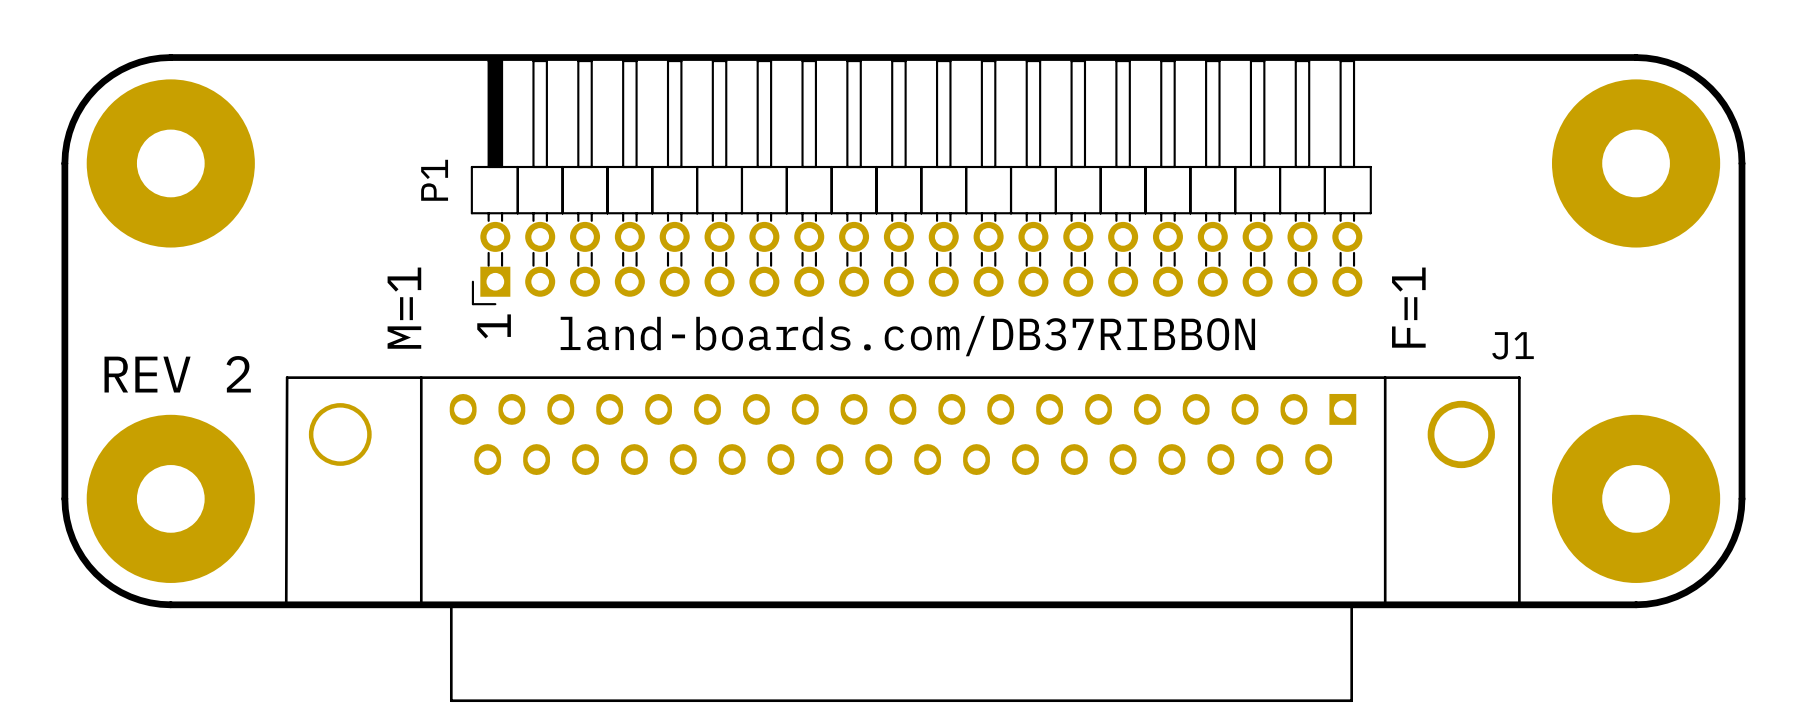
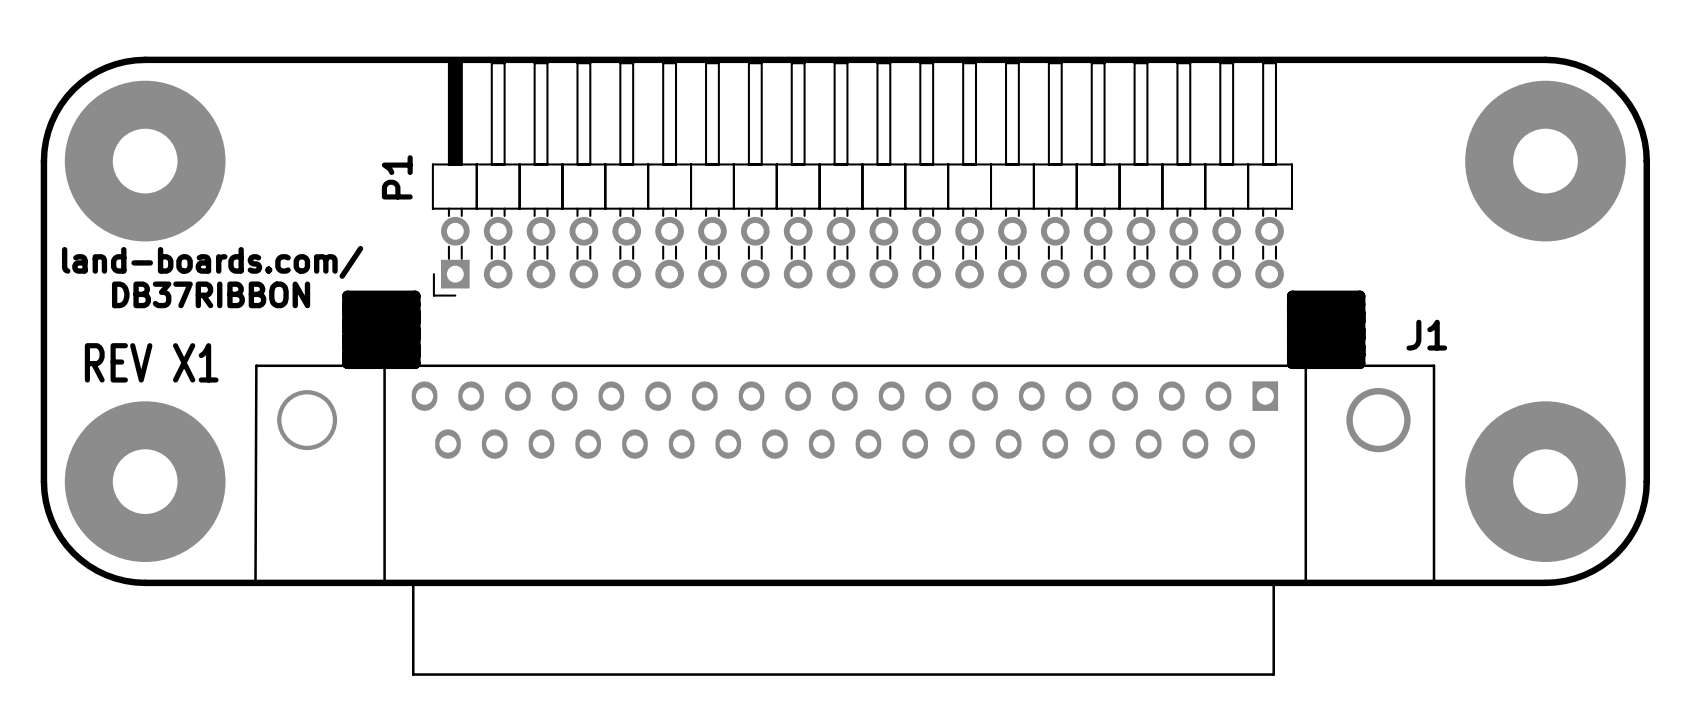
text: none -> land-boards.com/ (212, 262)
drawing: none -> [342, 290, 421, 370]
drawing: none -> [1286, 290, 1366, 370]
text: none -> DB37RIBBON (211, 294)
text: F=1 (1408, 307) -> none
text: M=1 (404, 308) -> none
text: 1 (494, 326) -> none
text: land-boards.com/DB37RIBBON (907, 336) -> none
text: REV 2 (177, 374) -> REV X1 (151, 362)

